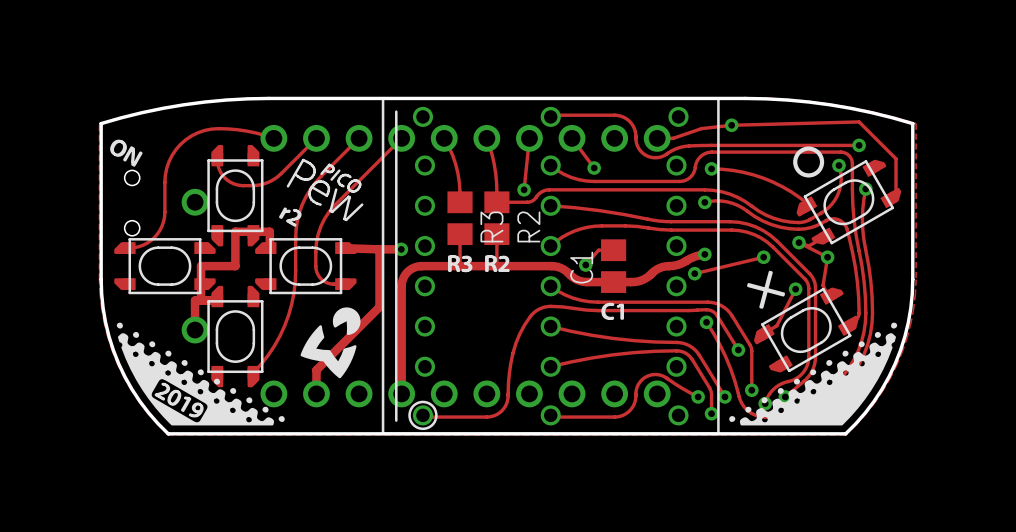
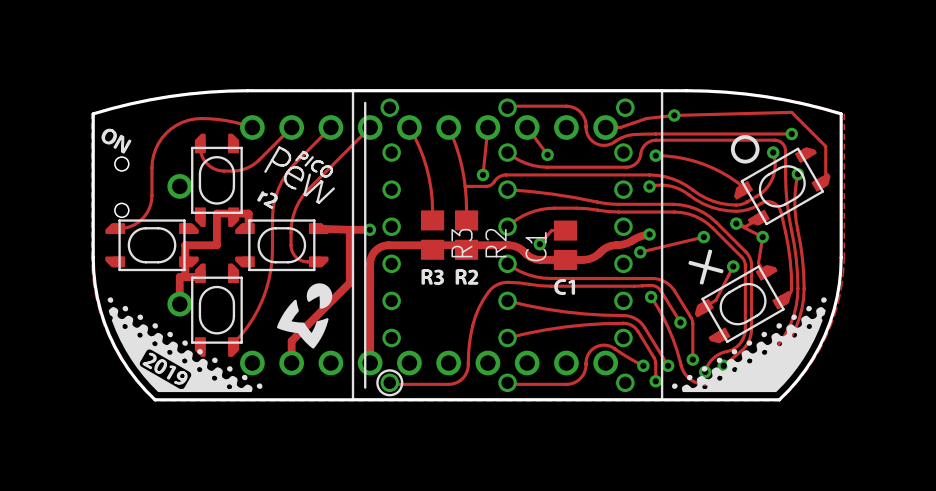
track: (444, 138) (455, 164) (459, 182) (460, 202) -> (409, 127) (426, 167) (431, 189) (432, 220)
track: (486, 138) (494, 164) (496, 202) (504, 202) -> (448, 127) (456, 146) (463, 176) (466, 220)
R3 position: (460, 218) -> (432, 235)
R2 position: (496, 218) -> (466, 235)
track: (460, 234) (460, 266) -> none
track: (496, 234) (496, 266) -> none
drawing: [447, 255, 461, 273] -> none
drawing: [485, 255, 498, 273] -> none
drawing position: (466, 263) -> (438, 277)
drawing position: (503, 263) -> (473, 277)
drawing: none -> [421, 269, 433, 285]
drawing: none -> [455, 269, 467, 285]

